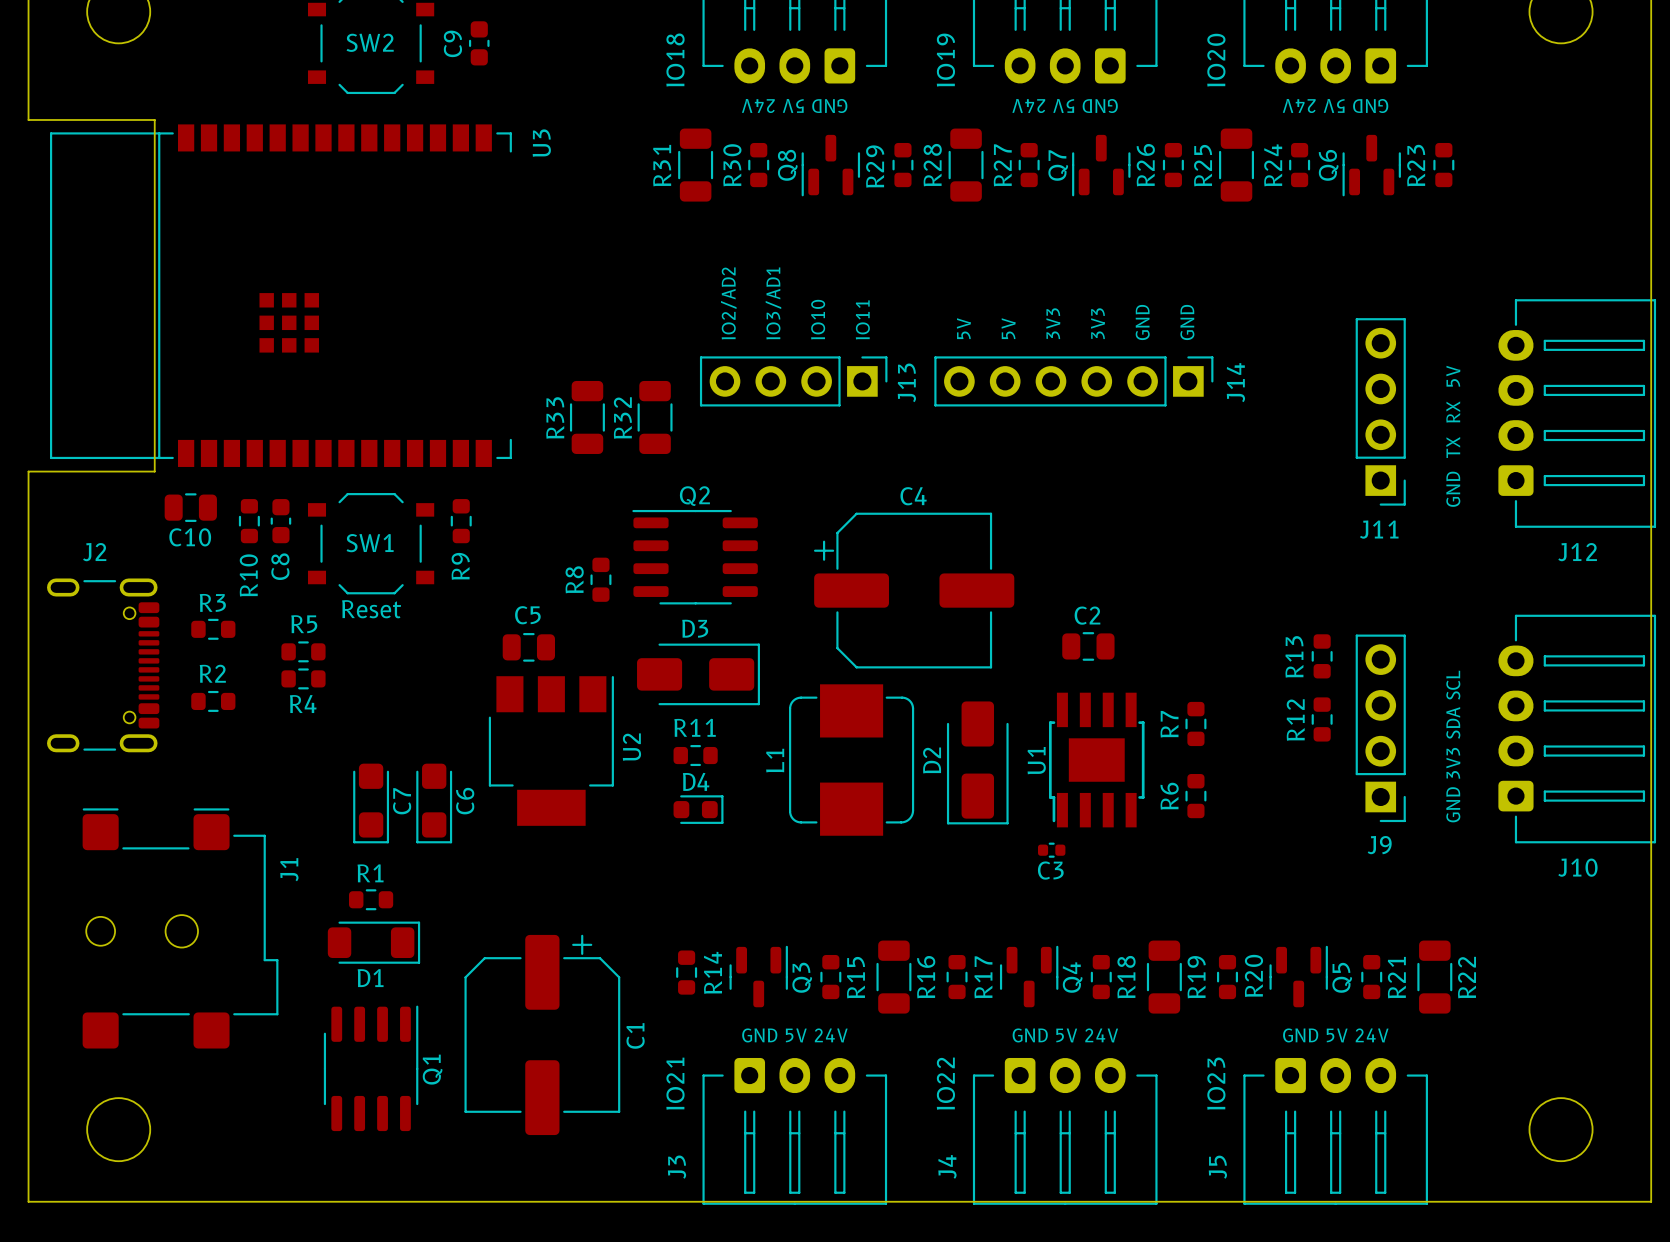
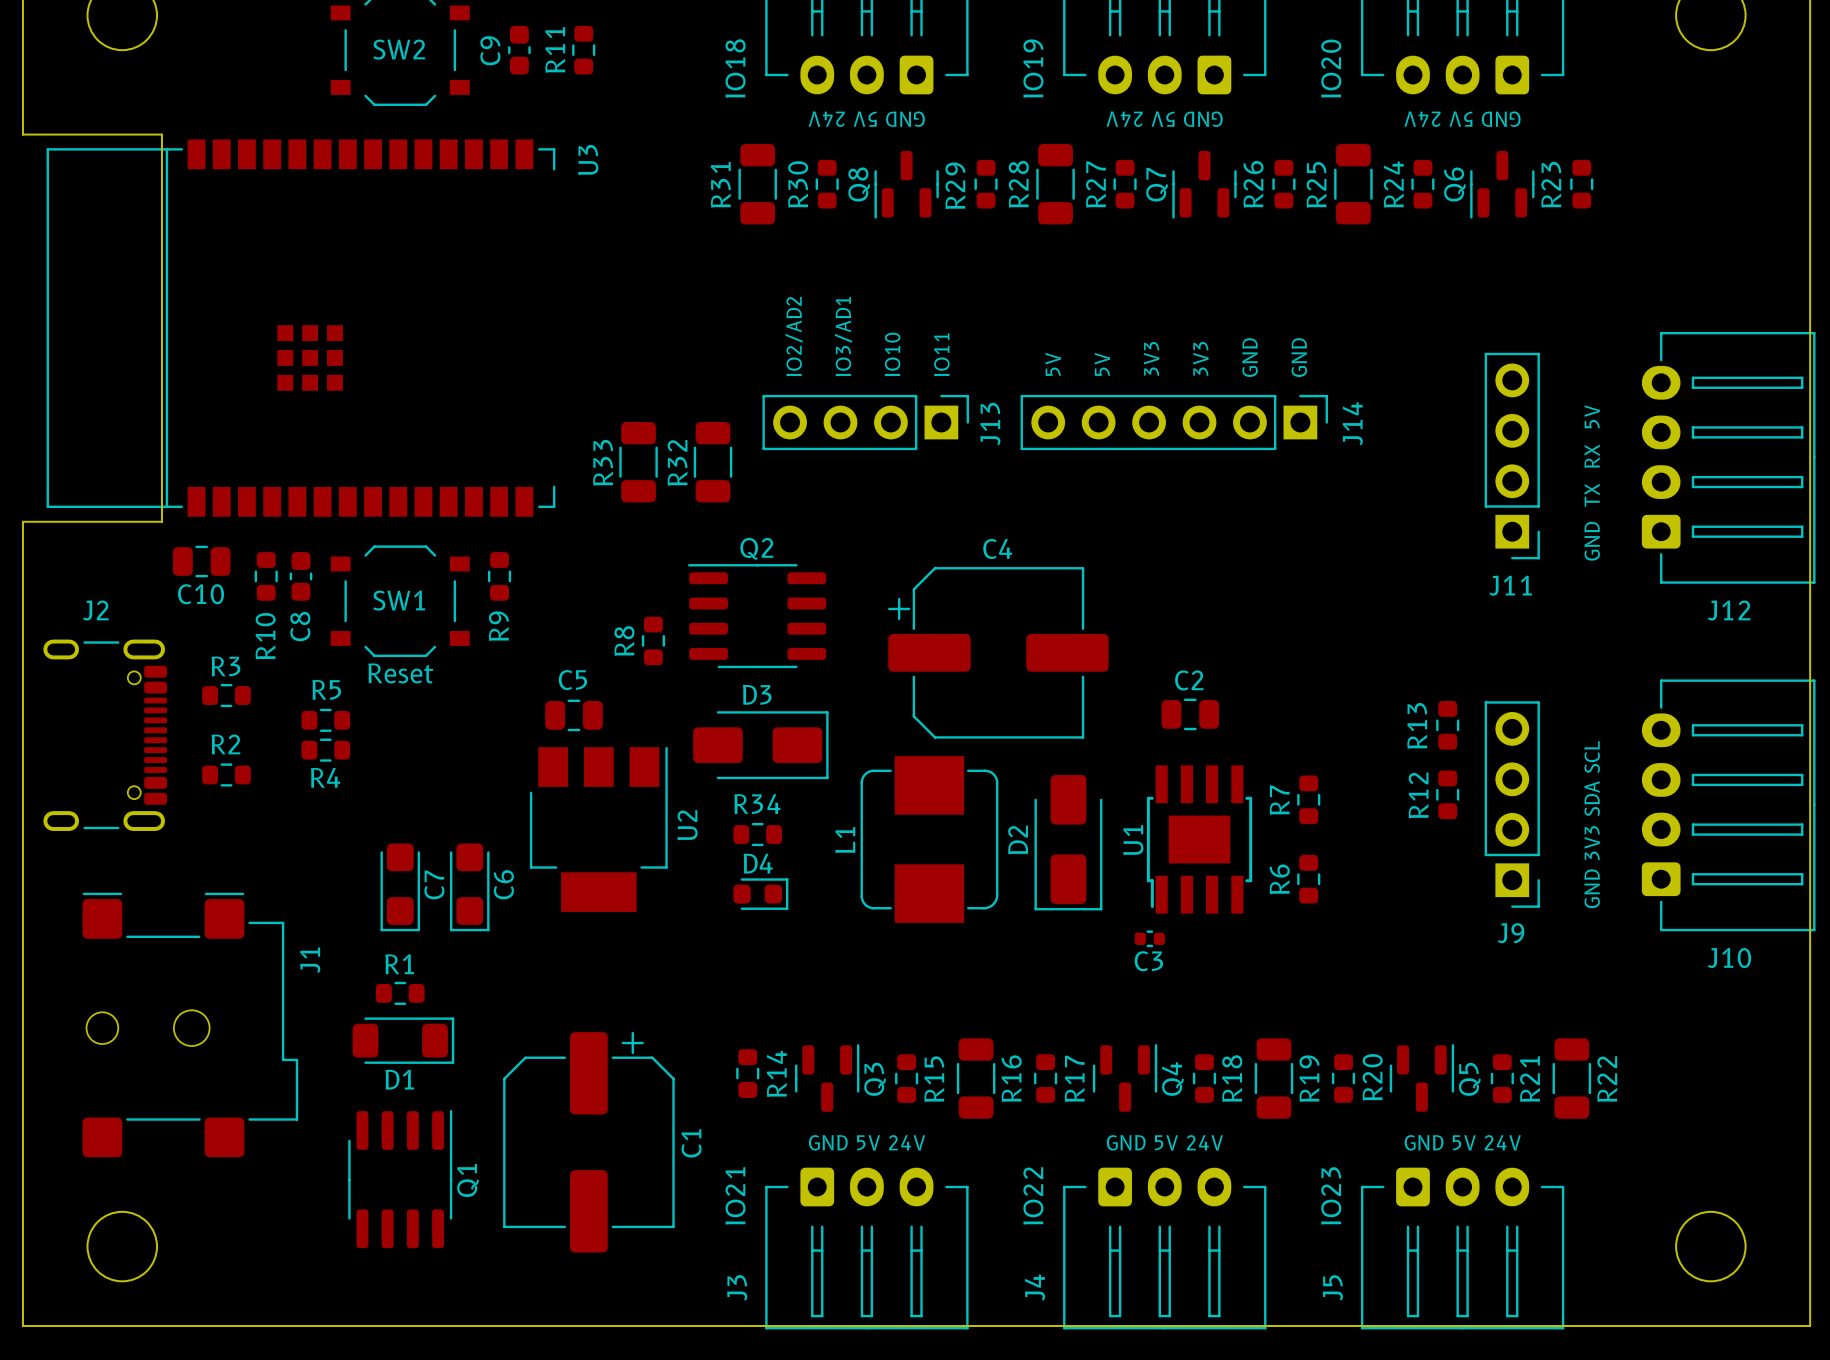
R11: none -> (583, 50)
R11 name: R11 (695, 727) -> R34 (757, 804)

